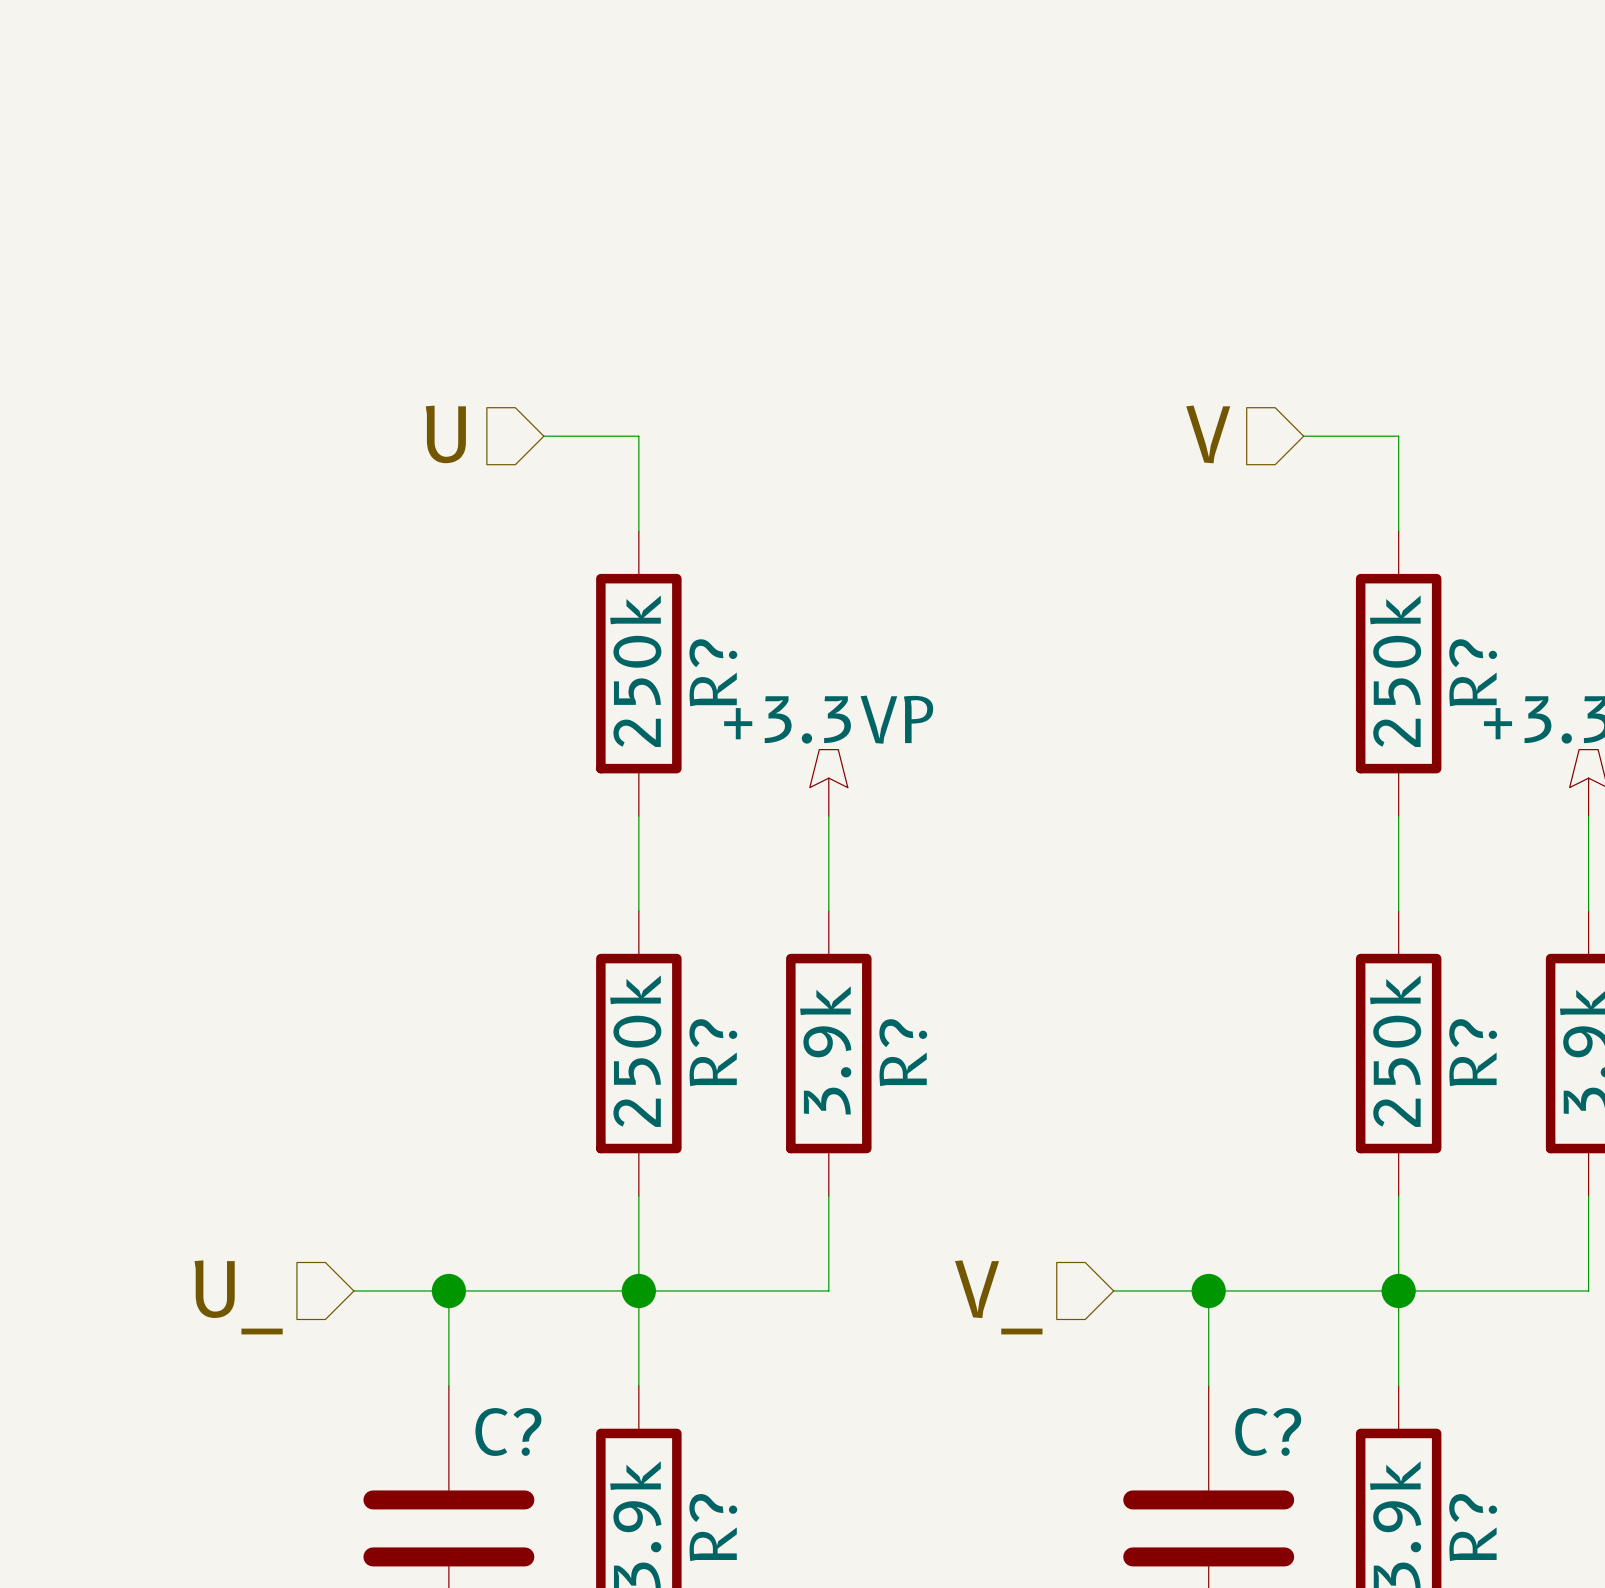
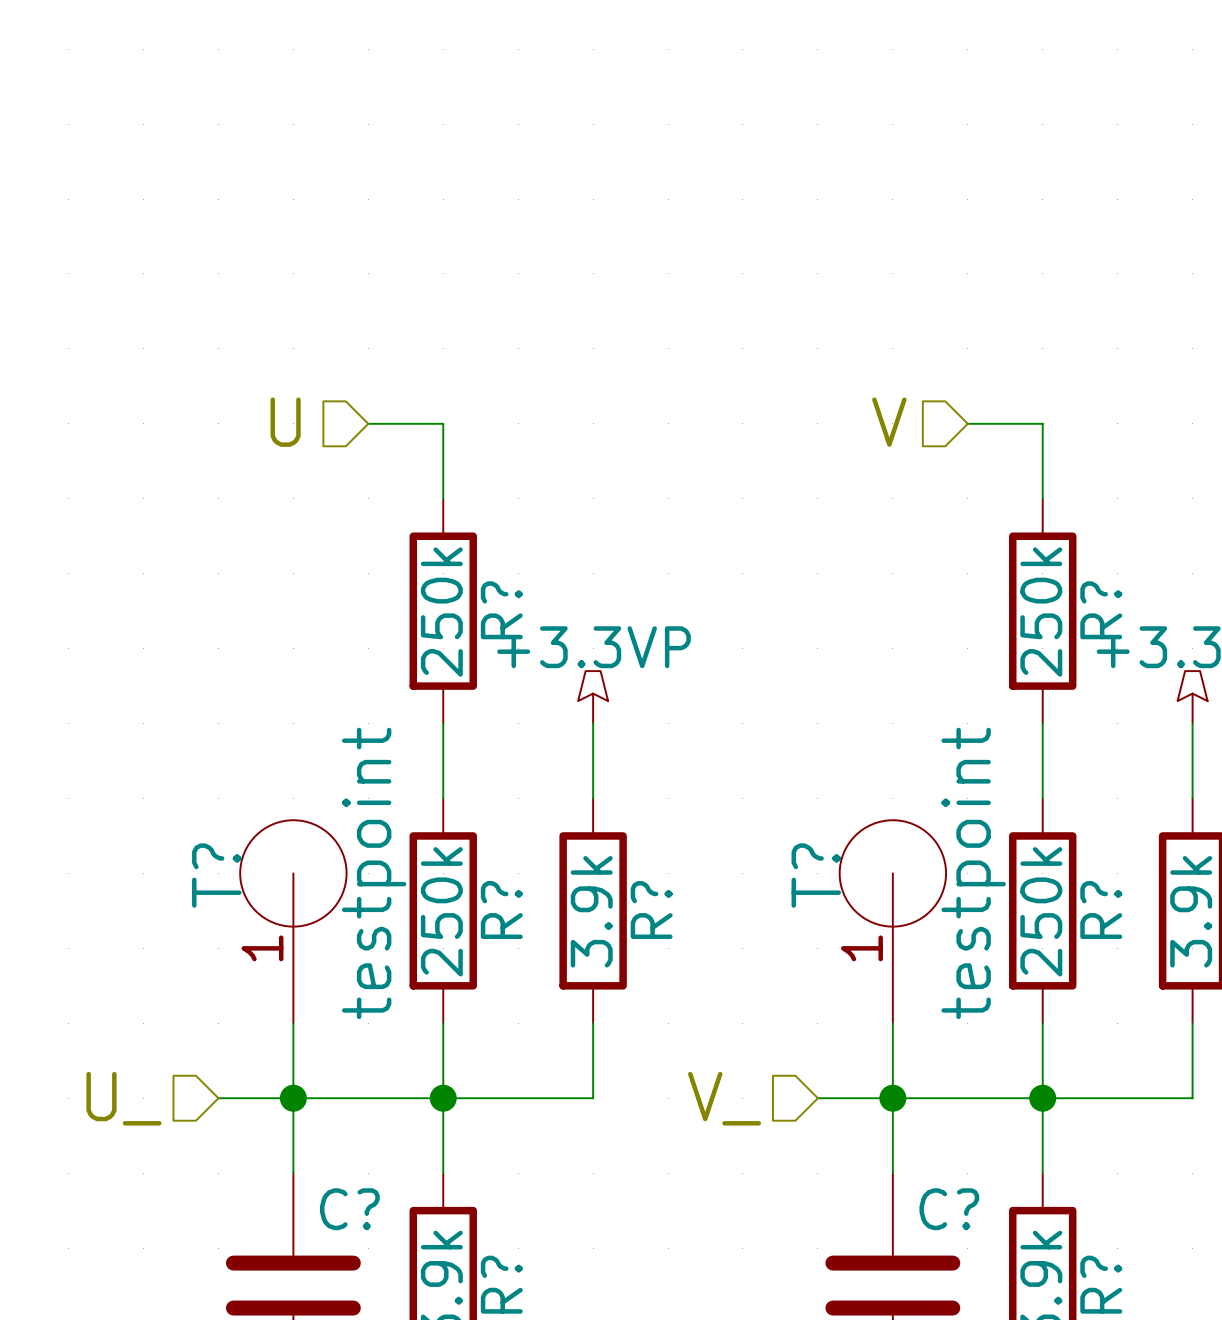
T?: none -> testpoint (293, 921)
T?: none -> testpoint (892, 921)
wire: none -> (293, 1023) (293, 1098)
wire: none -> (892, 1023) (892, 1098)

